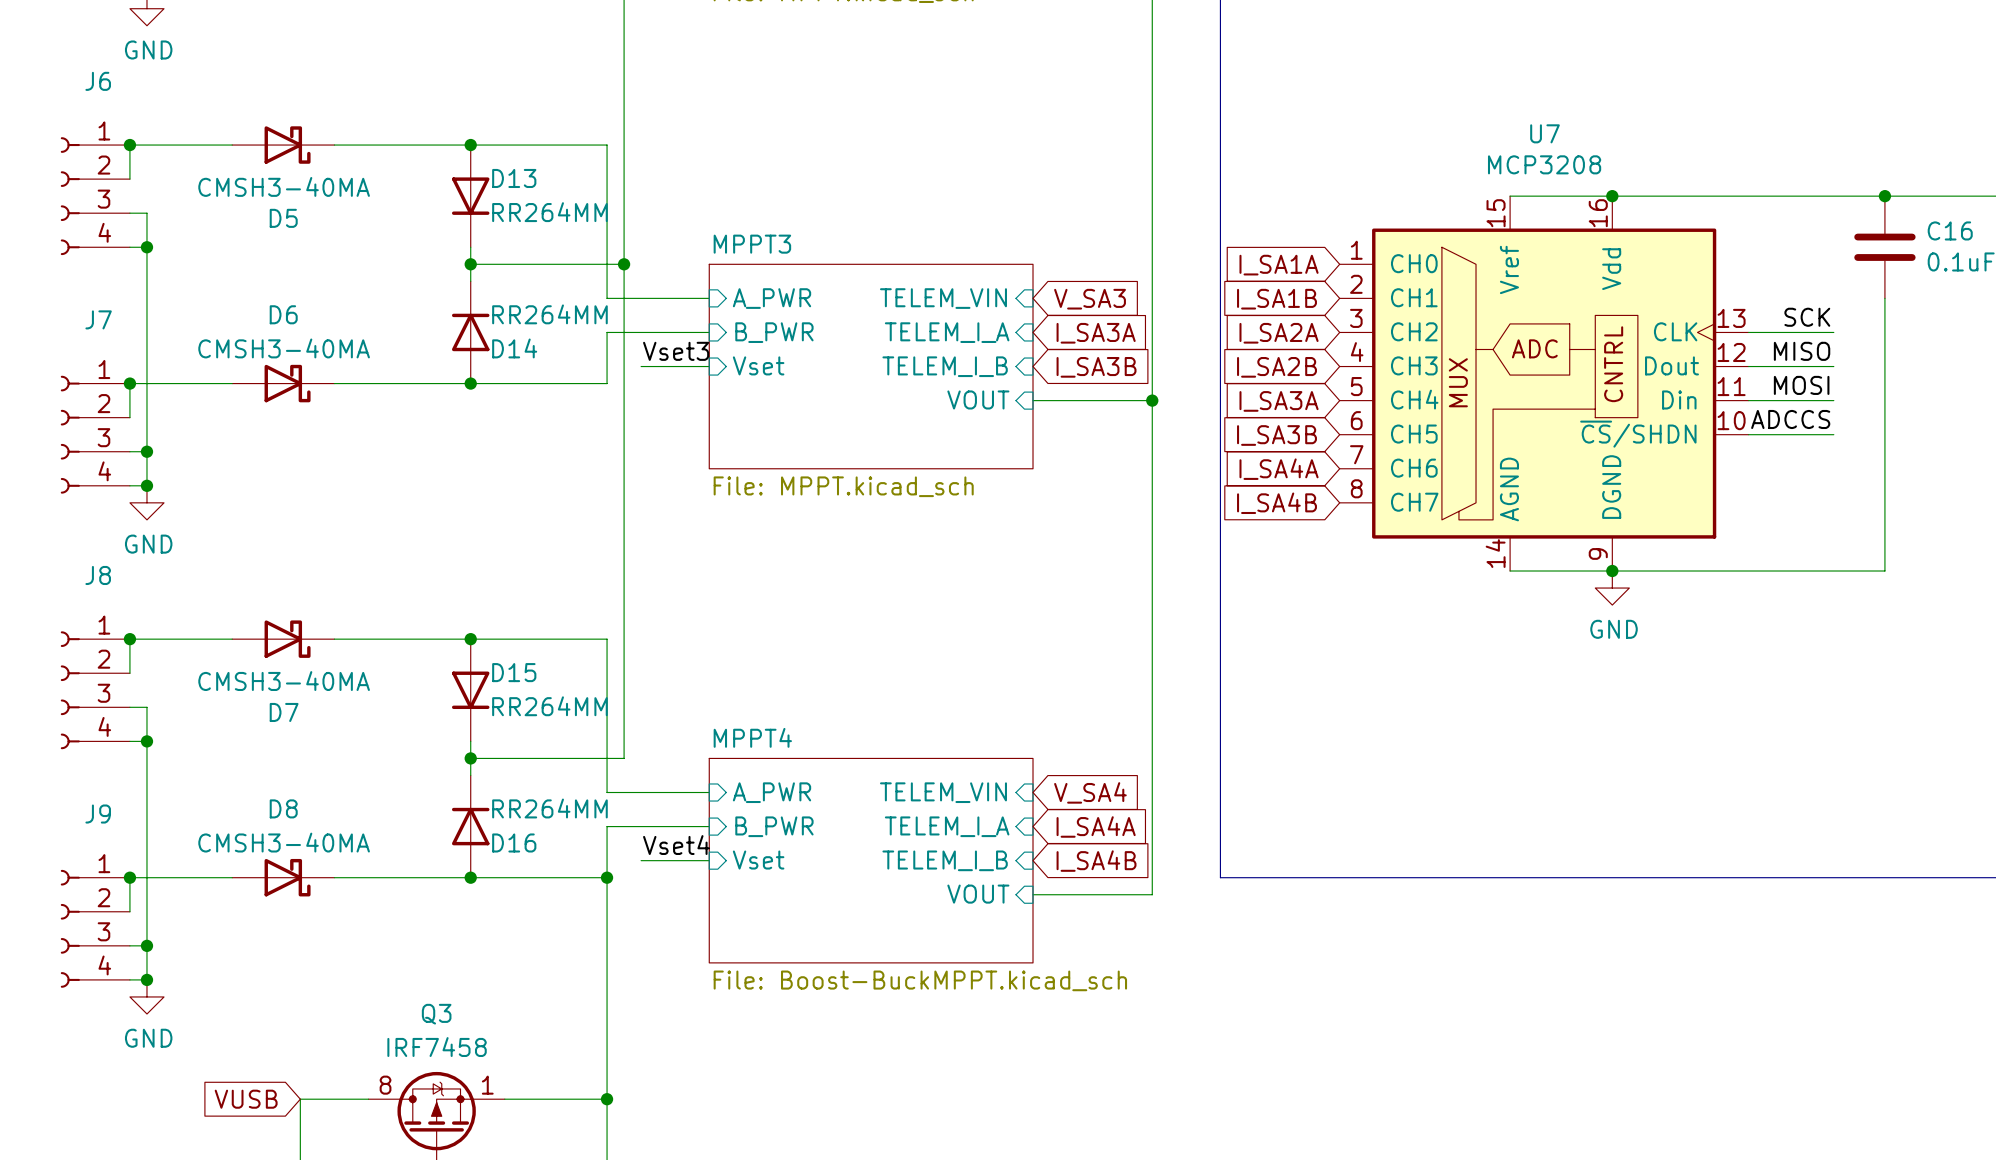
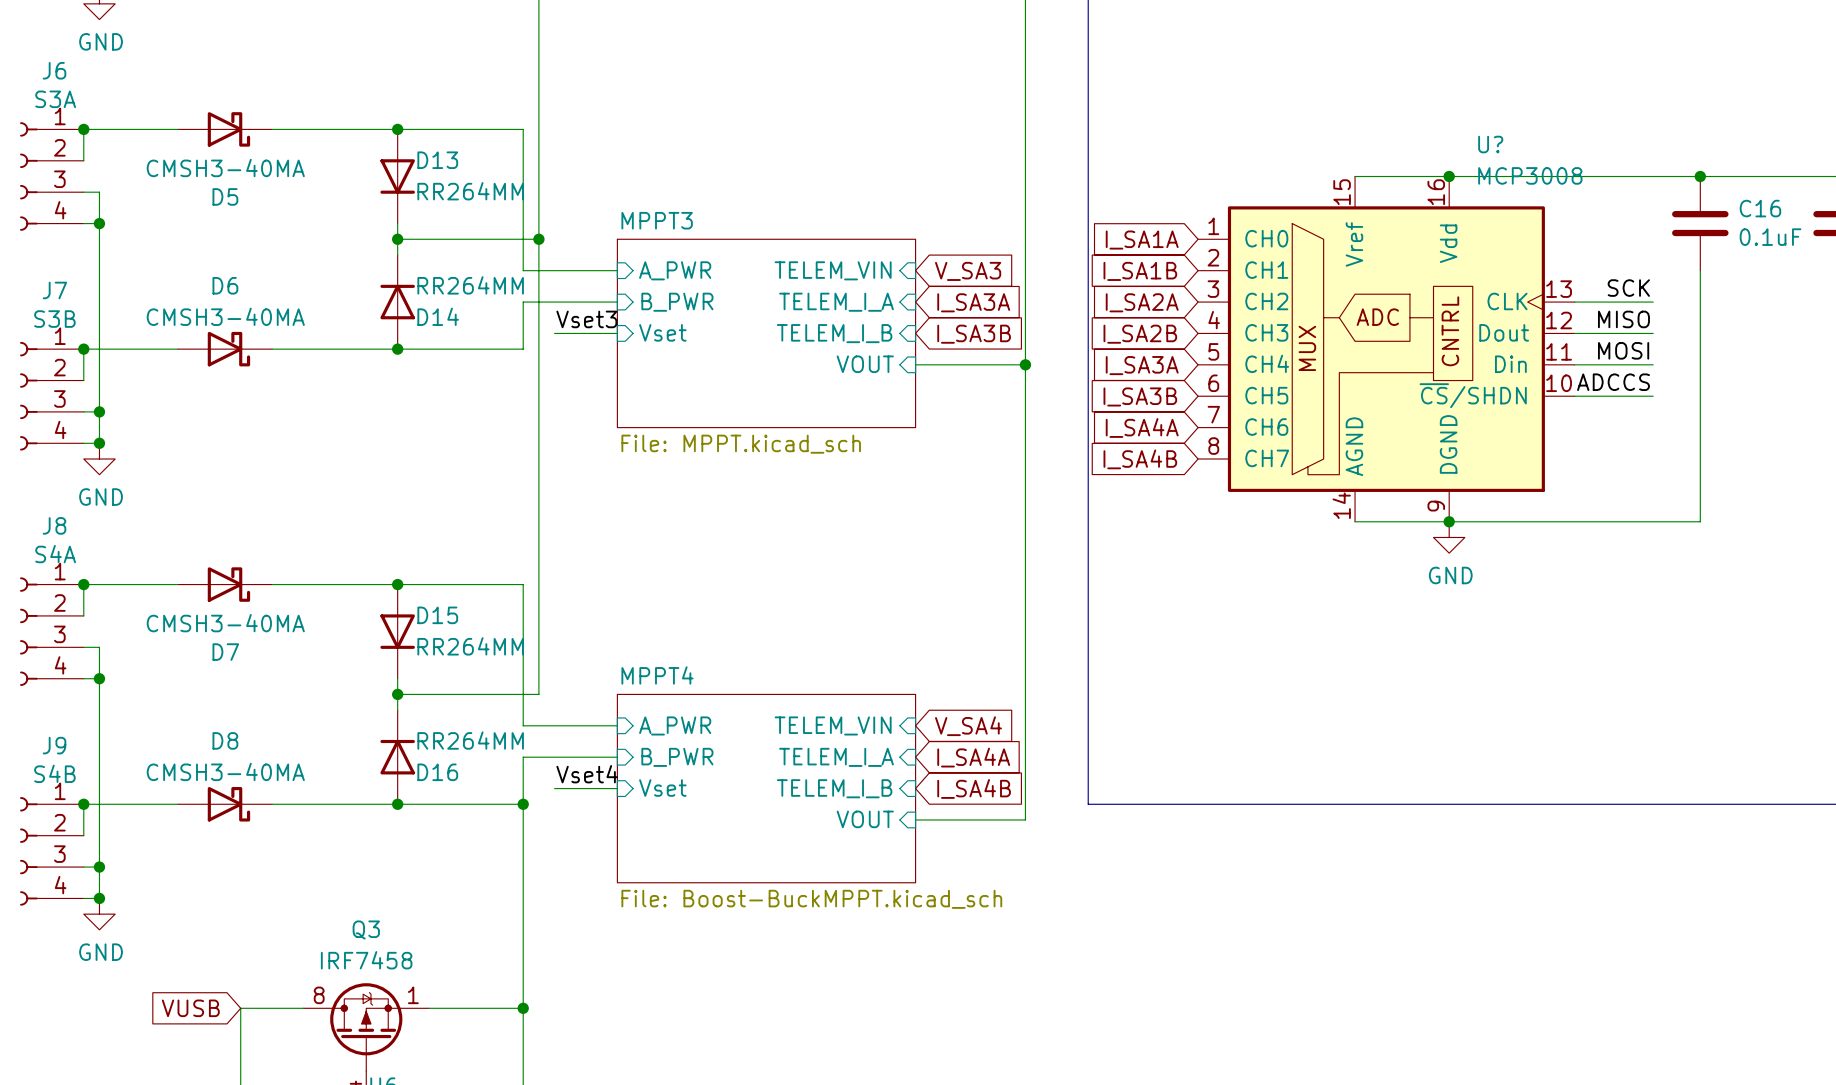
J6 value: none -> S3A (55, 99)
U7 name: U7 (1544, 133) -> U? (1490, 144)
U7 value: MCP3208 (1544, 164) -> MCP3008 (1530, 175)
J7 value: none -> S3B (54, 319)
J8 value: none -> S4A (55, 554)
J9 value: none -> S4B (54, 773)

